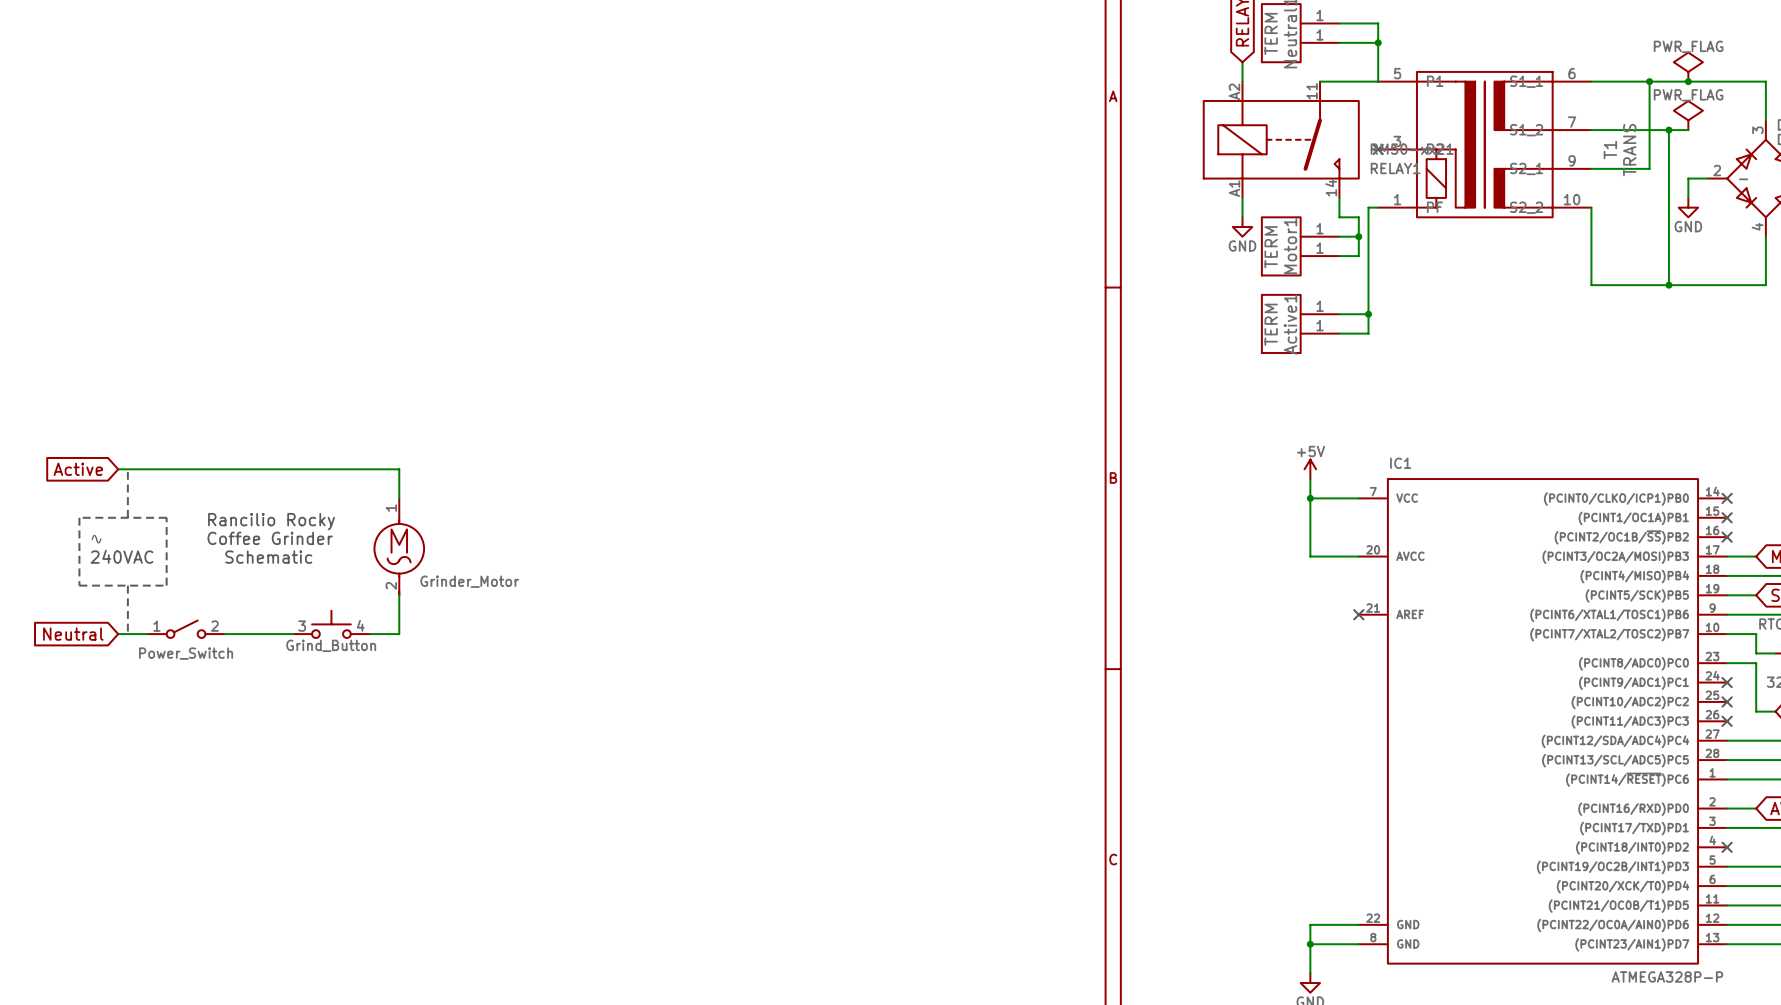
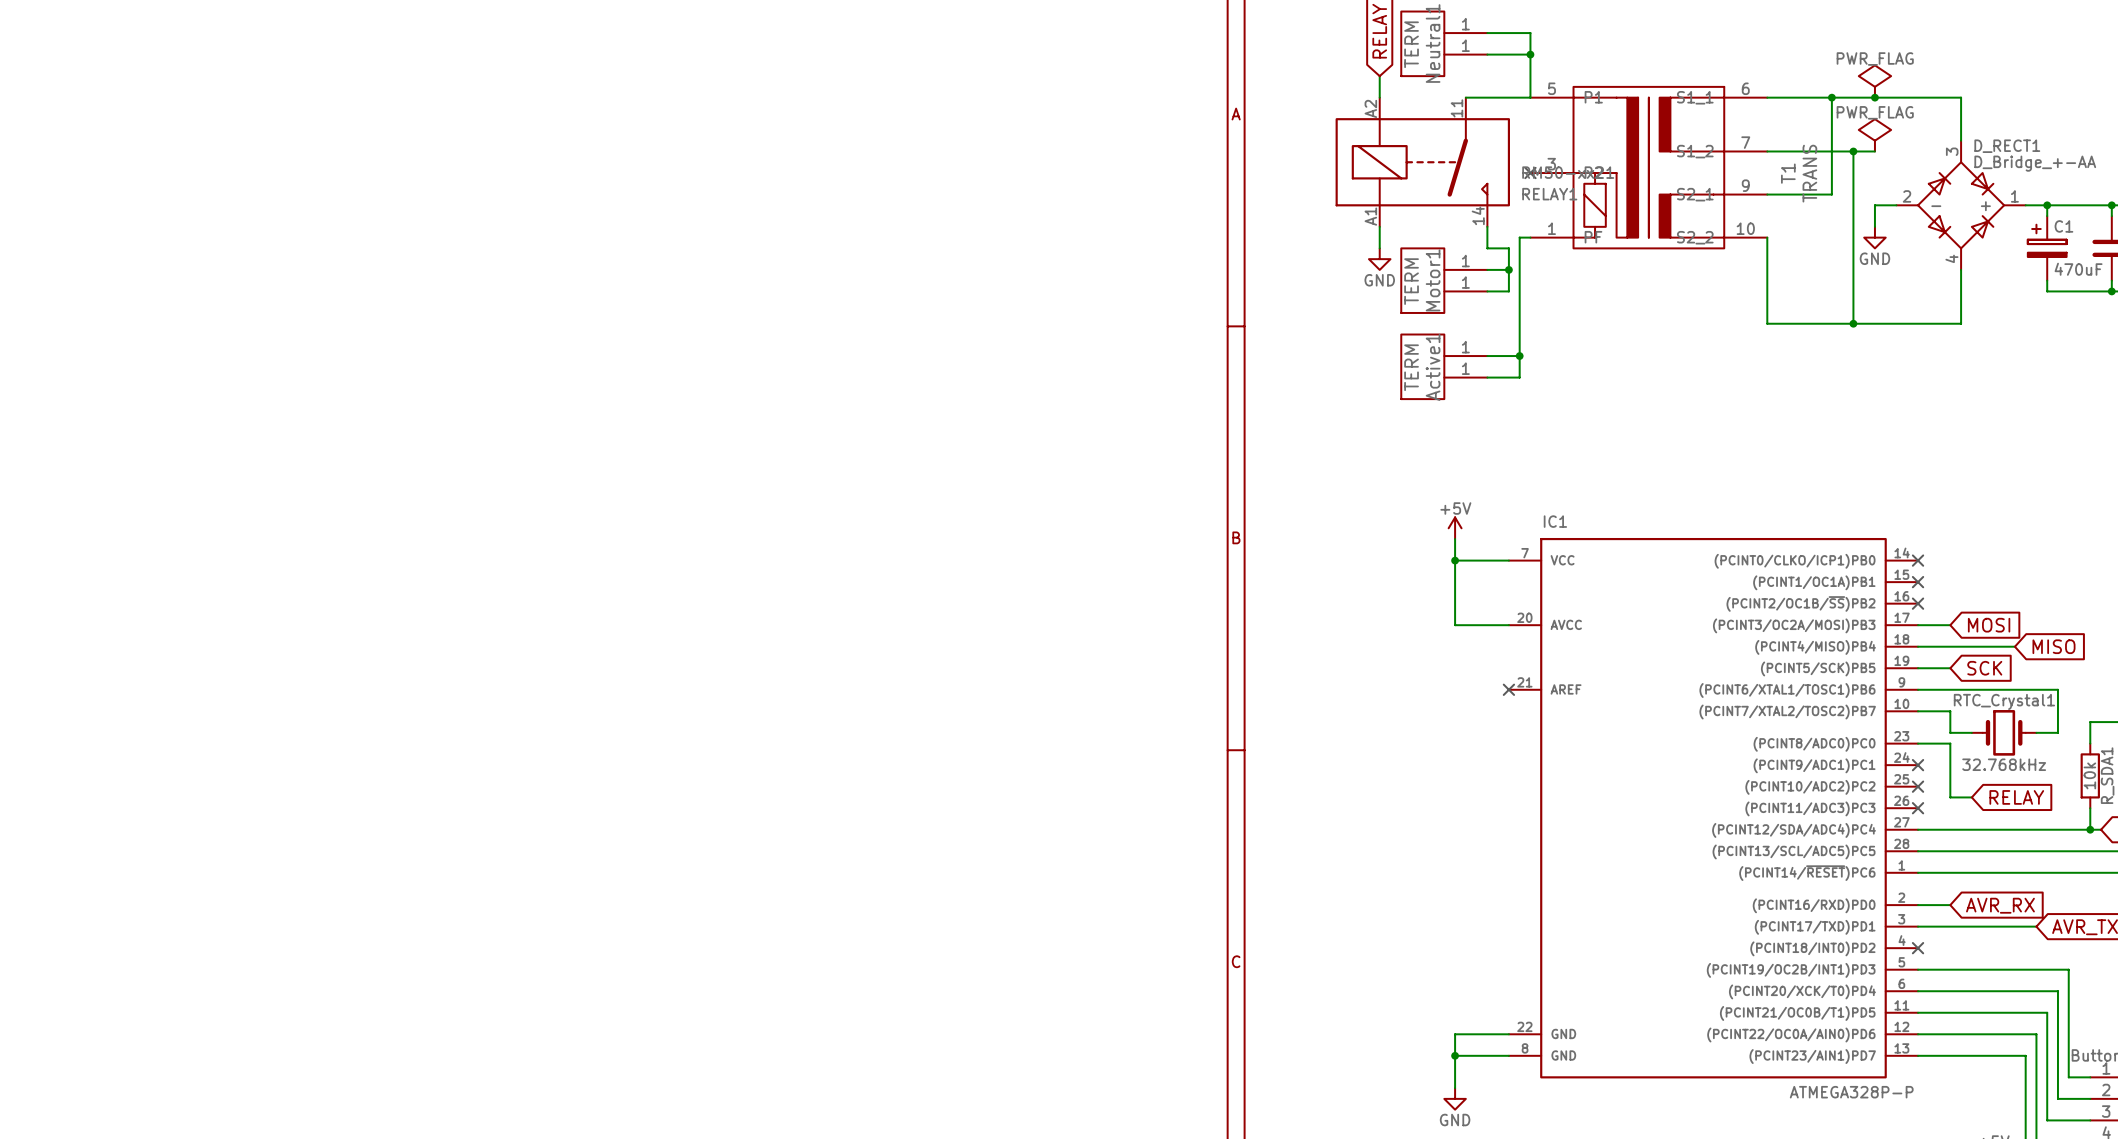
global label: Active (78, 469) -> none
wire: (118, 469) (399, 469) (399, 498) -> none
line: (127, 469) (127, 517) -> none
line: (79, 517) (79, 585) (166, 585) (166, 517) (79, 517) -> none
text: Rancilio Rocky (271, 521) -> none
text: Coffee Grinder (270, 538) -> none
text: ∿ (96, 539) -> none
part: Grinder_Motor (399, 546) -> none
text: 240VAC (122, 556) -> none
text: Schematic (268, 557) -> none
line: (127, 585) (127, 634) -> none
wire: (399, 595) (399, 634) (370, 634) -> none
part: Grind_Button (331, 624) -> none
part: Power_Switch (186, 629) -> none
global label: Neutral (73, 634) -> none
wire: (118, 634) (147, 634) -> none
wire: (224, 634) (292, 634) -> none

